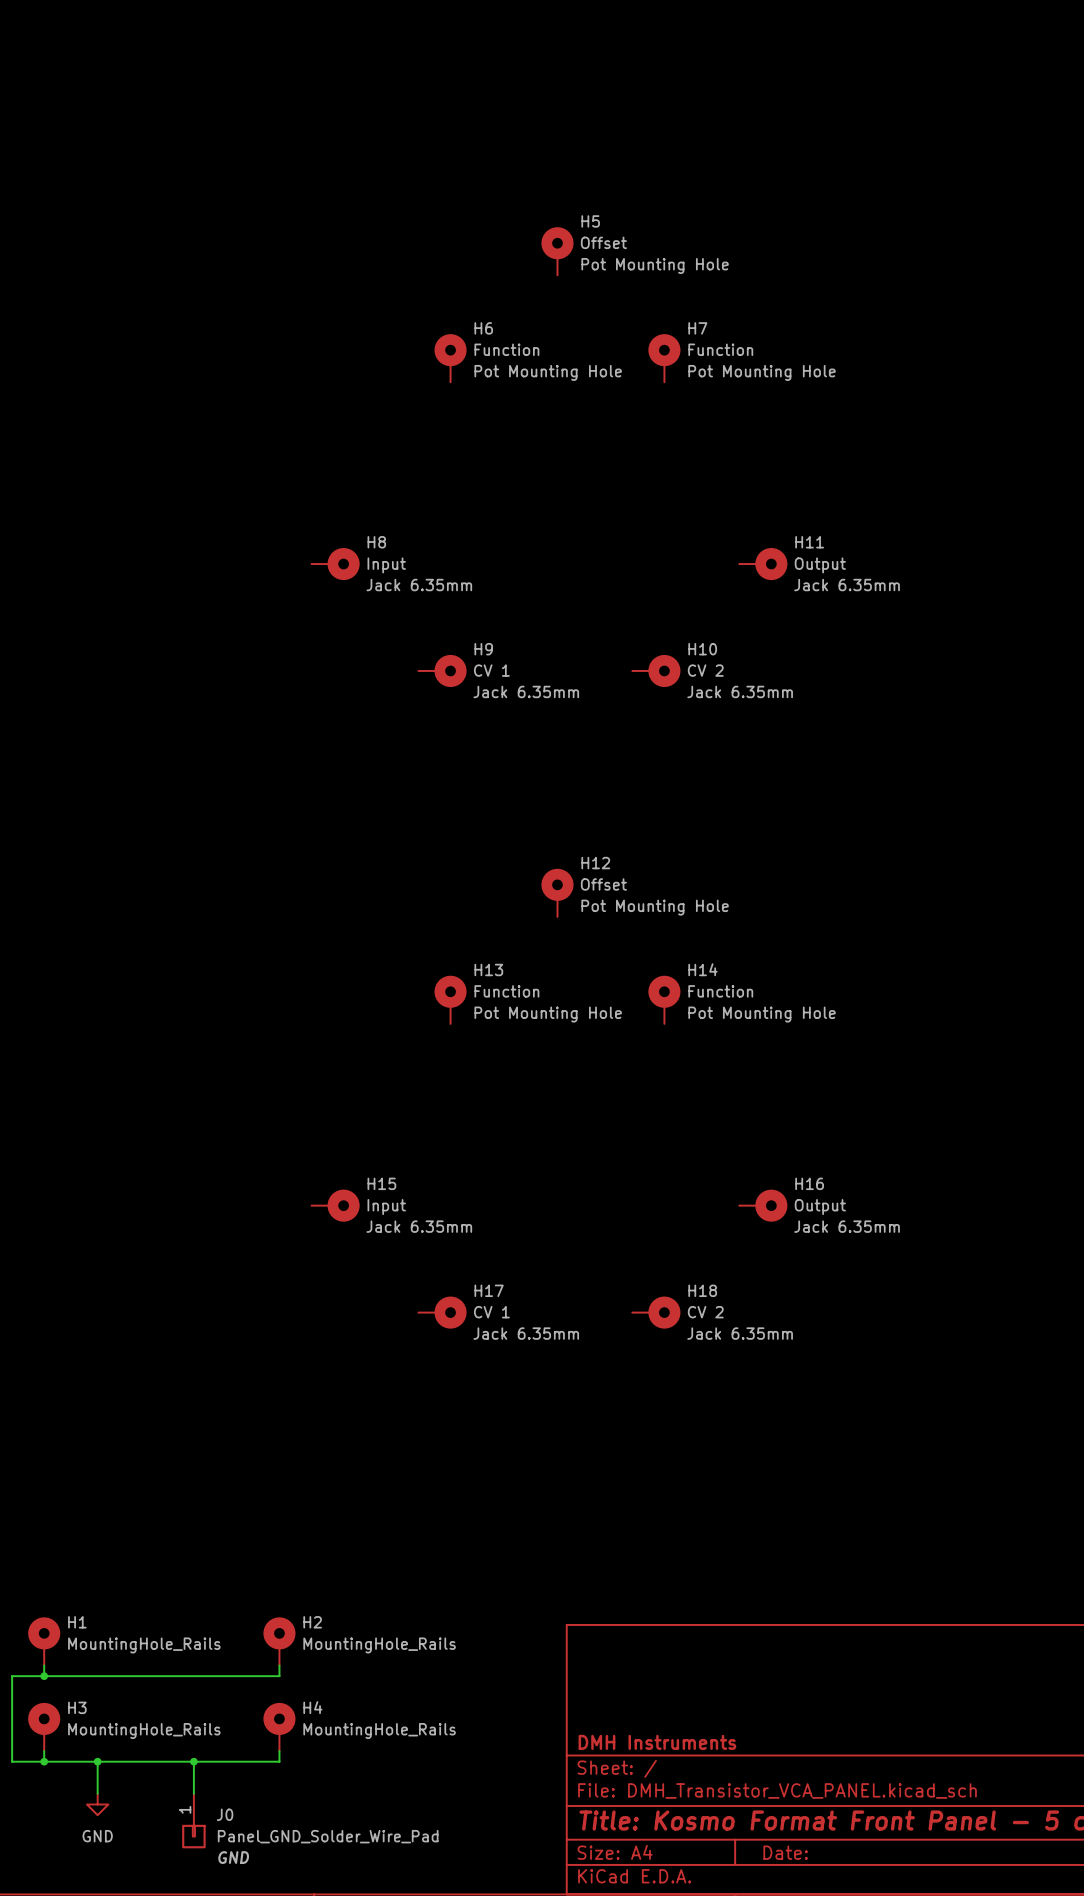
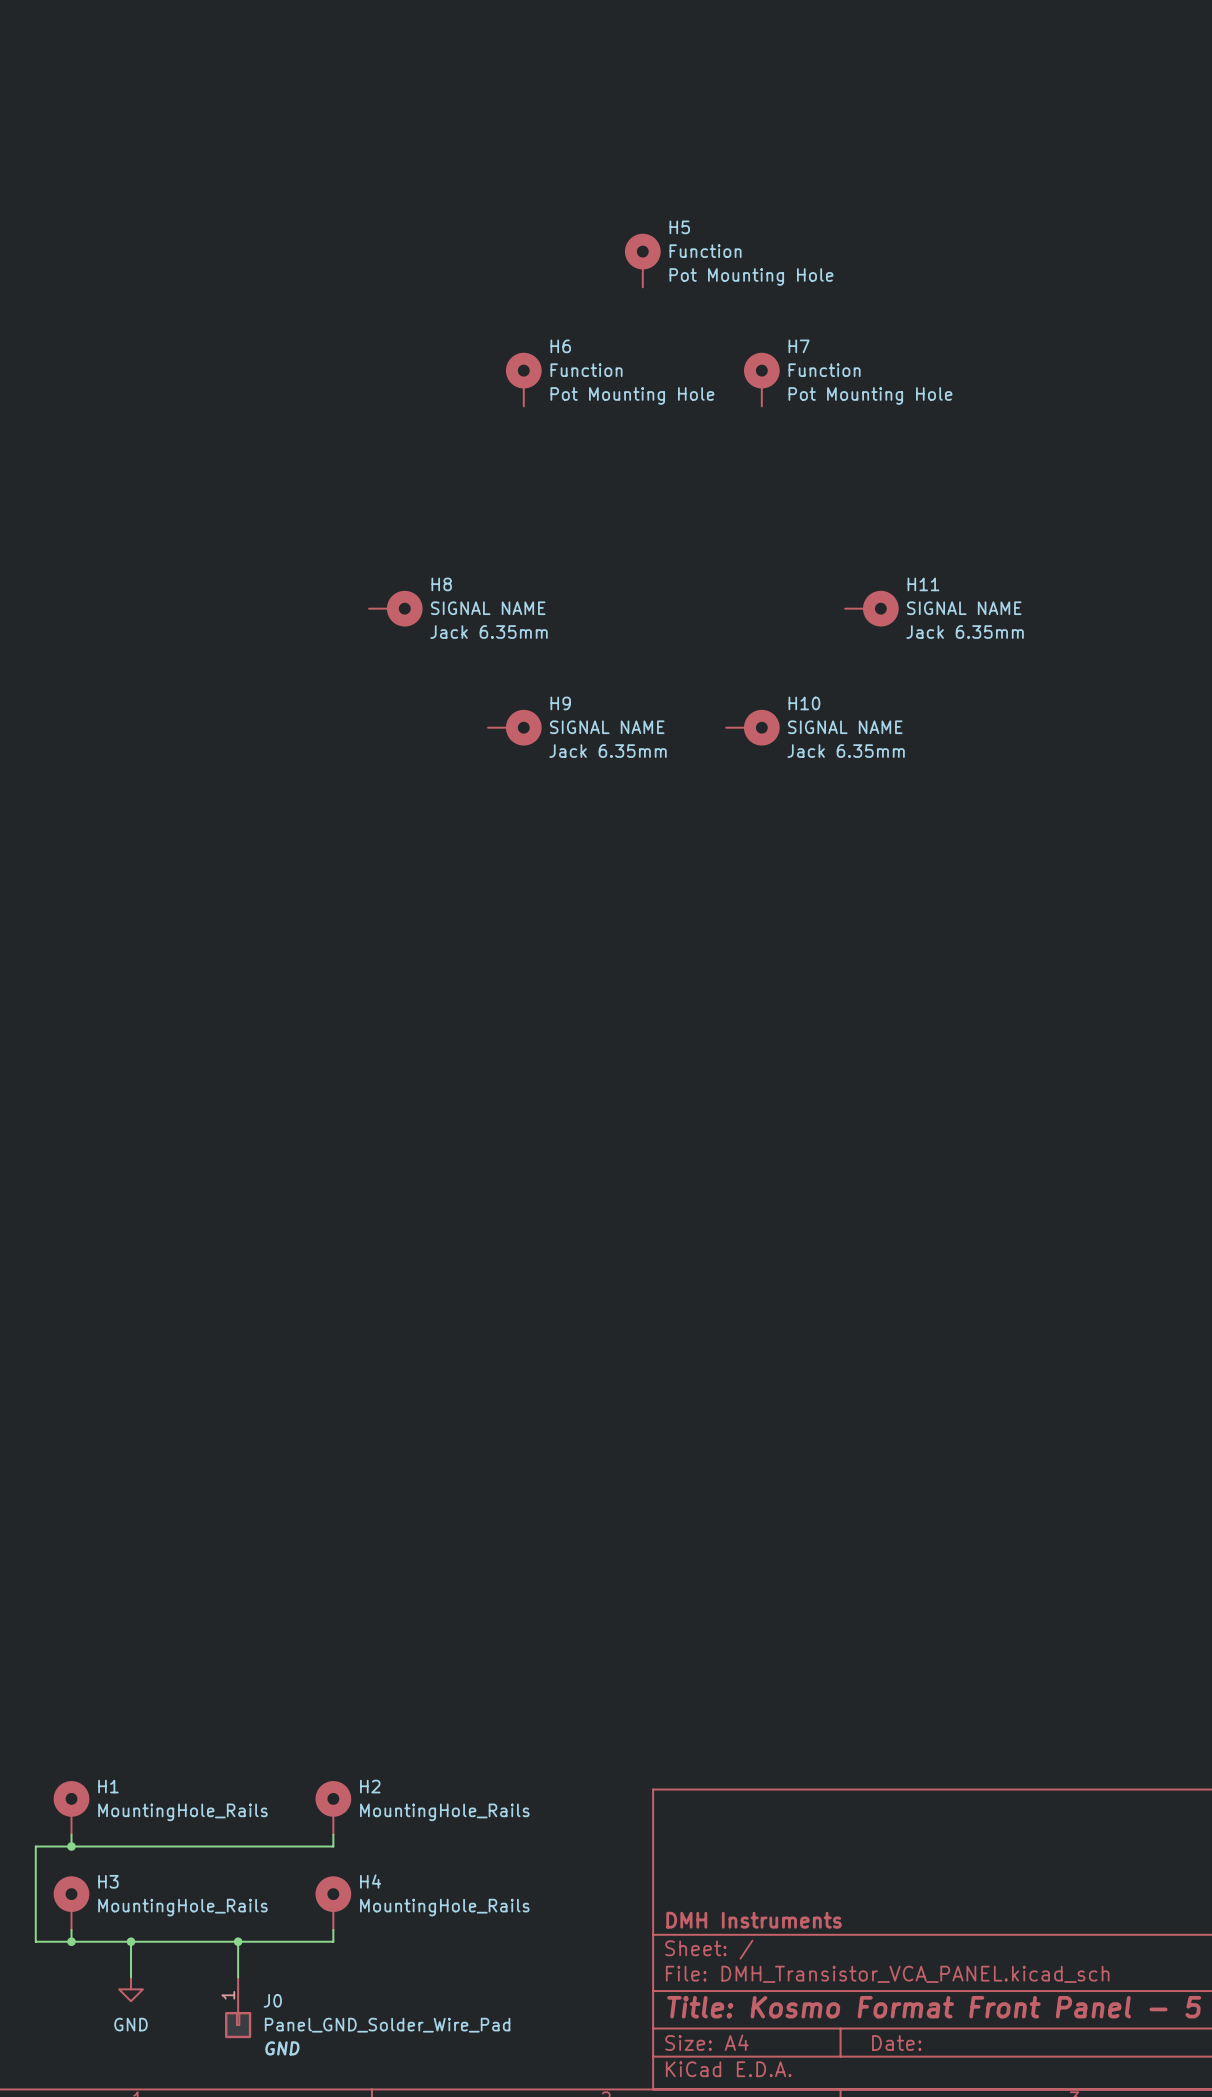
H5 value: Offset (603, 242) -> Function (705, 251)
H8 value: Input (386, 565) -> SIGNAL NAME (488, 608)
H11 value: Output (820, 565) -> SIGNAL NAME (964, 608)
H9 value: CV 1 (491, 670) -> SIGNAL NAME (607, 727)
H10 value: CV 2 (705, 670) -> SIGNAL NAME (845, 727)
H12: Offset (557, 892) -> none
H13: Function (450, 999) -> none
H14: Function (664, 999) -> none
H15: Input (335, 1205) -> none
H16: Output (763, 1205) -> none
H17: CV 1 (442, 1312) -> none
H18: CV 2 (656, 1312) -> none

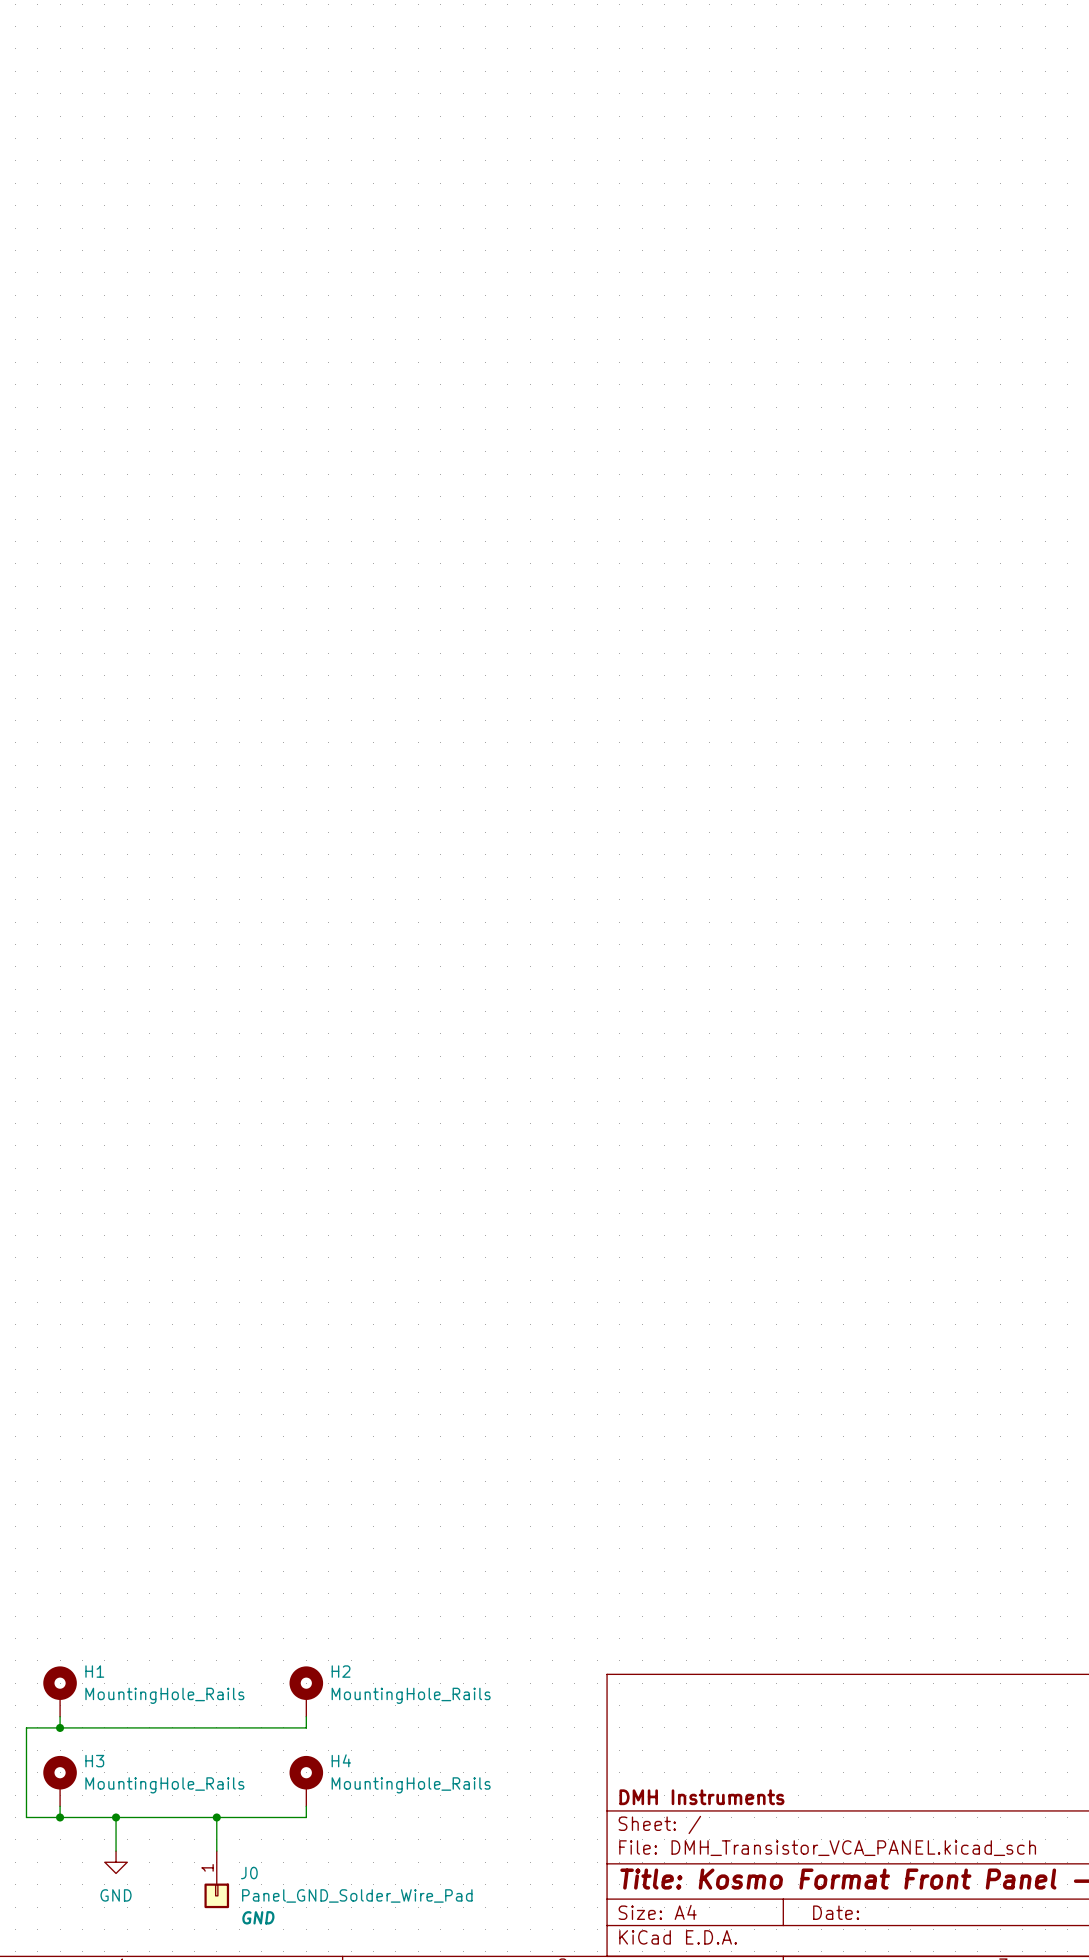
H5: Function (642, 260) -> none
H6: Function (523, 379) -> none
H7: Function (761, 379) -> none
H8: SIGNAL NAME (395, 608) -> none
H11: SIGNAL NAME (871, 608) -> none
H9: SIGNAL NAME (514, 727) -> none
H10: SIGNAL NAME (752, 727) -> none

